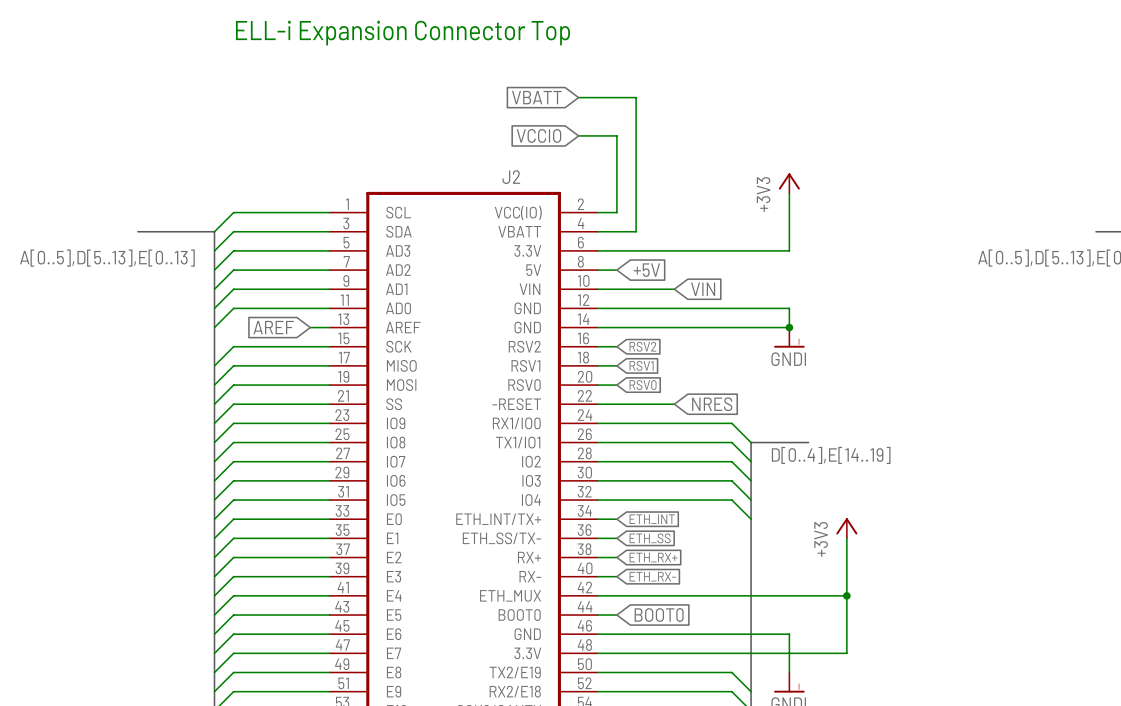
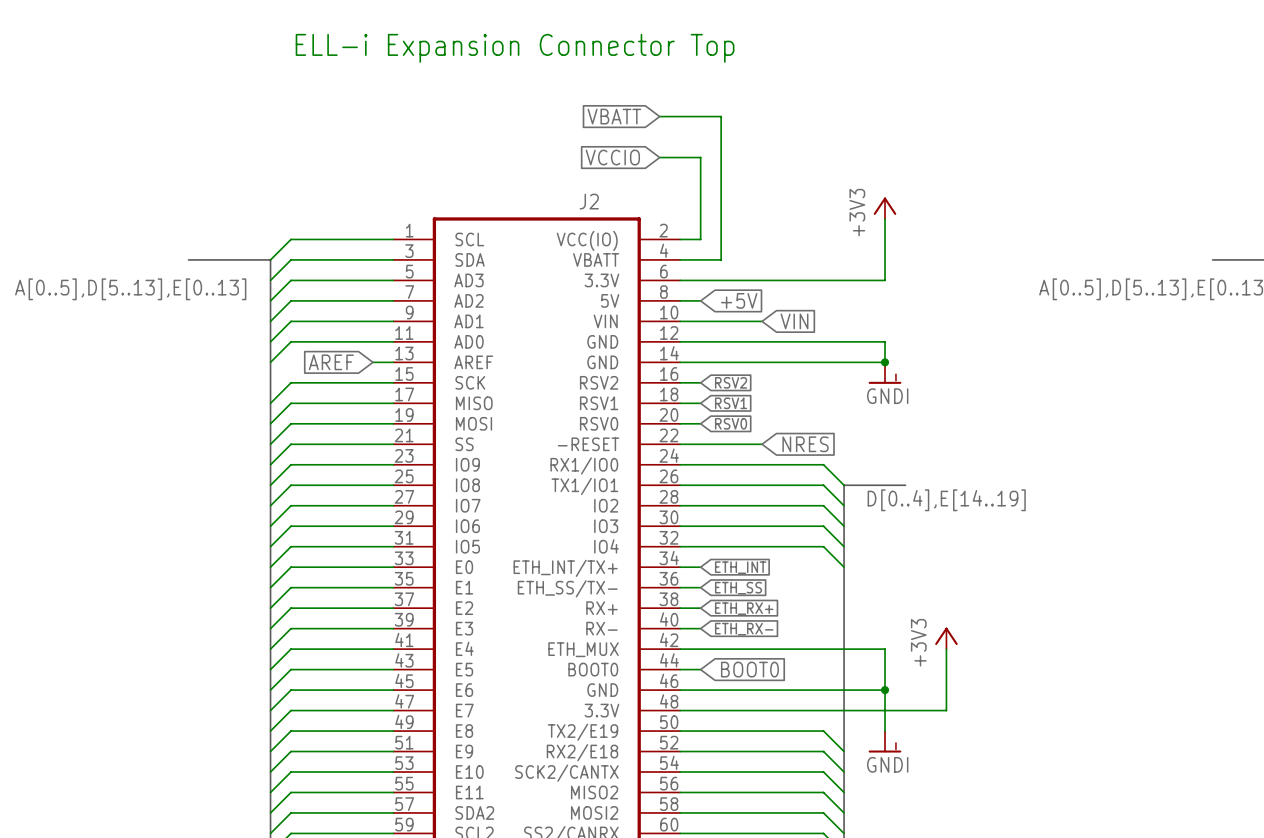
power symbol position: +3V3 (846, 528) -> +3V3 (946, 638)
wire: (846, 538) (846, 595) (789, 595) -> (885, 690) (885, 649)
junction: (846, 595) -> none
junction: none -> (885, 690)

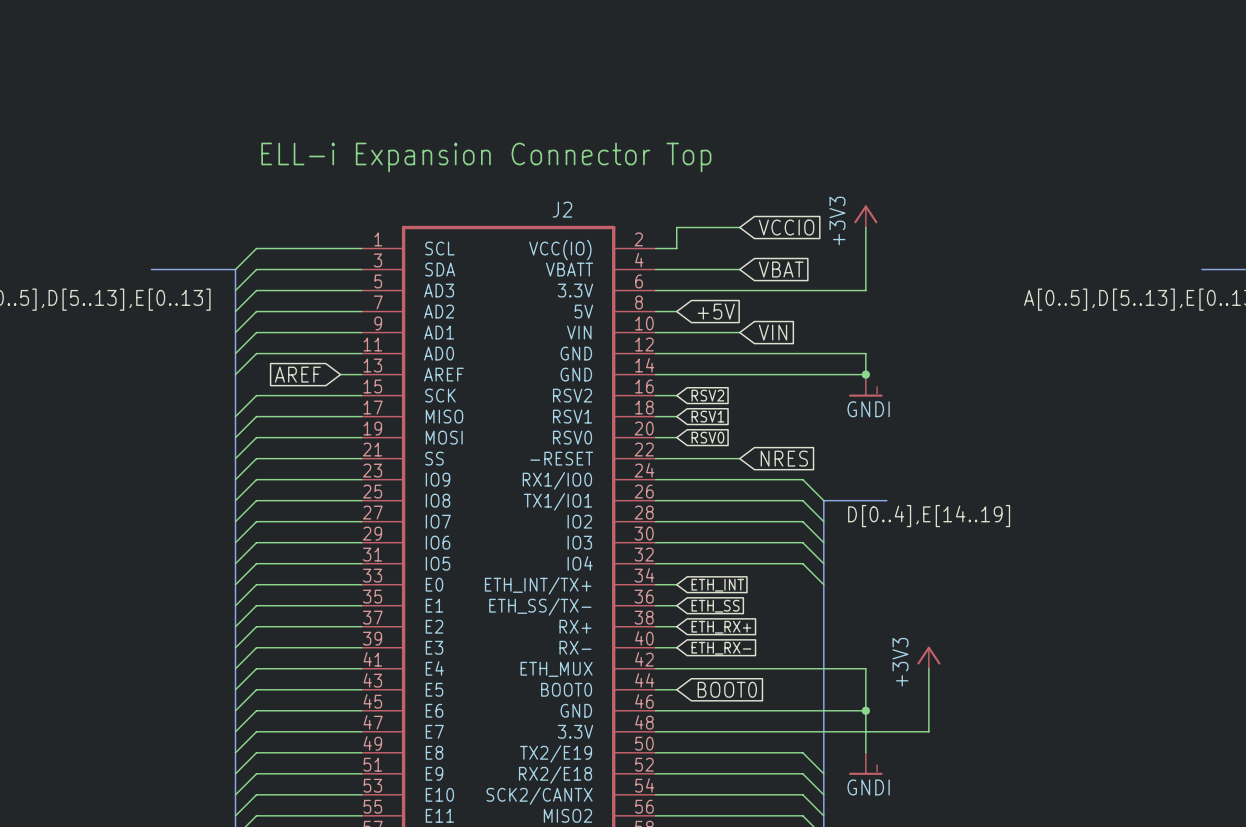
text position: ELL-i Expansion Connector Top (515, 48) -> ELL-i Expansion Connector Top (486, 157)
global label: VBATT (614, 116) -> none
wire: (659, 116) (721, 116) (721, 259) -> (739, 269) (697, 269)
global label rotation: 0° (612, 157) -> 180° (786, 227)
global label position: VCCIO (612, 157) -> VCCIO (786, 227)
wire: (659, 157) (700, 157) (700, 218) -> (739, 227) (676, 227)
global label: none -> VBAT (781, 269)

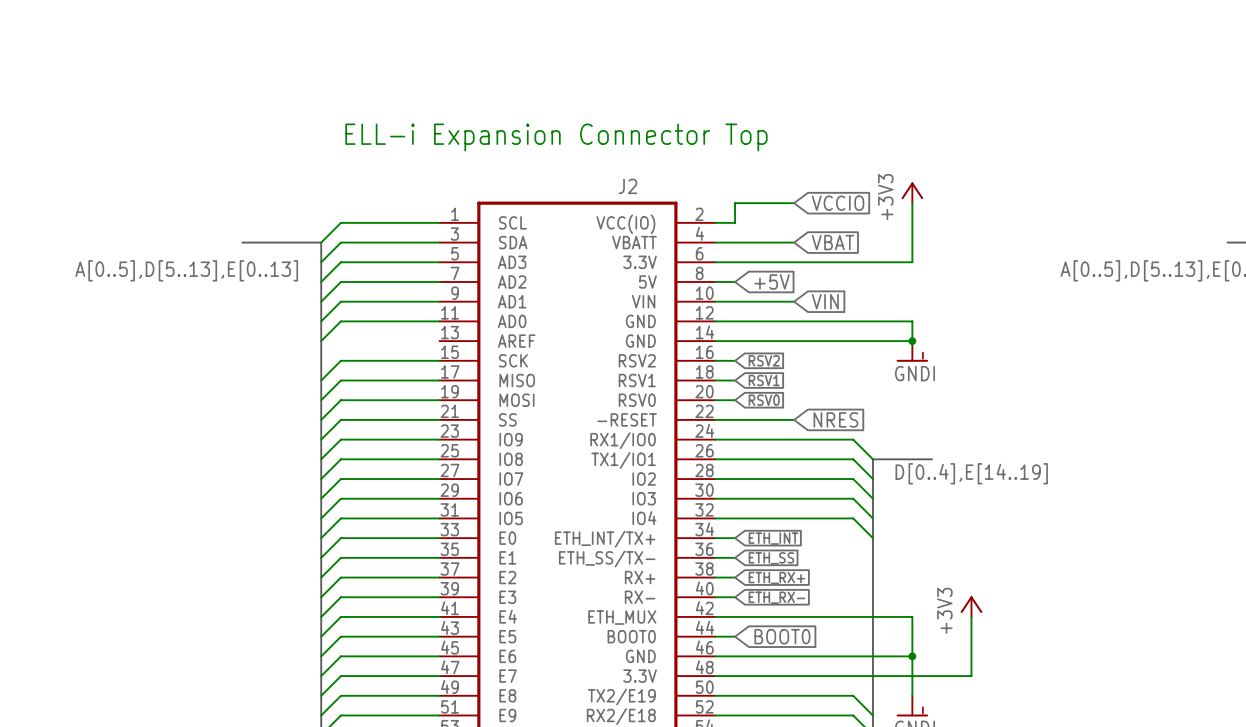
global label: AREF (297, 374) -> none
wire: (340, 374) (361, 374) -> none

